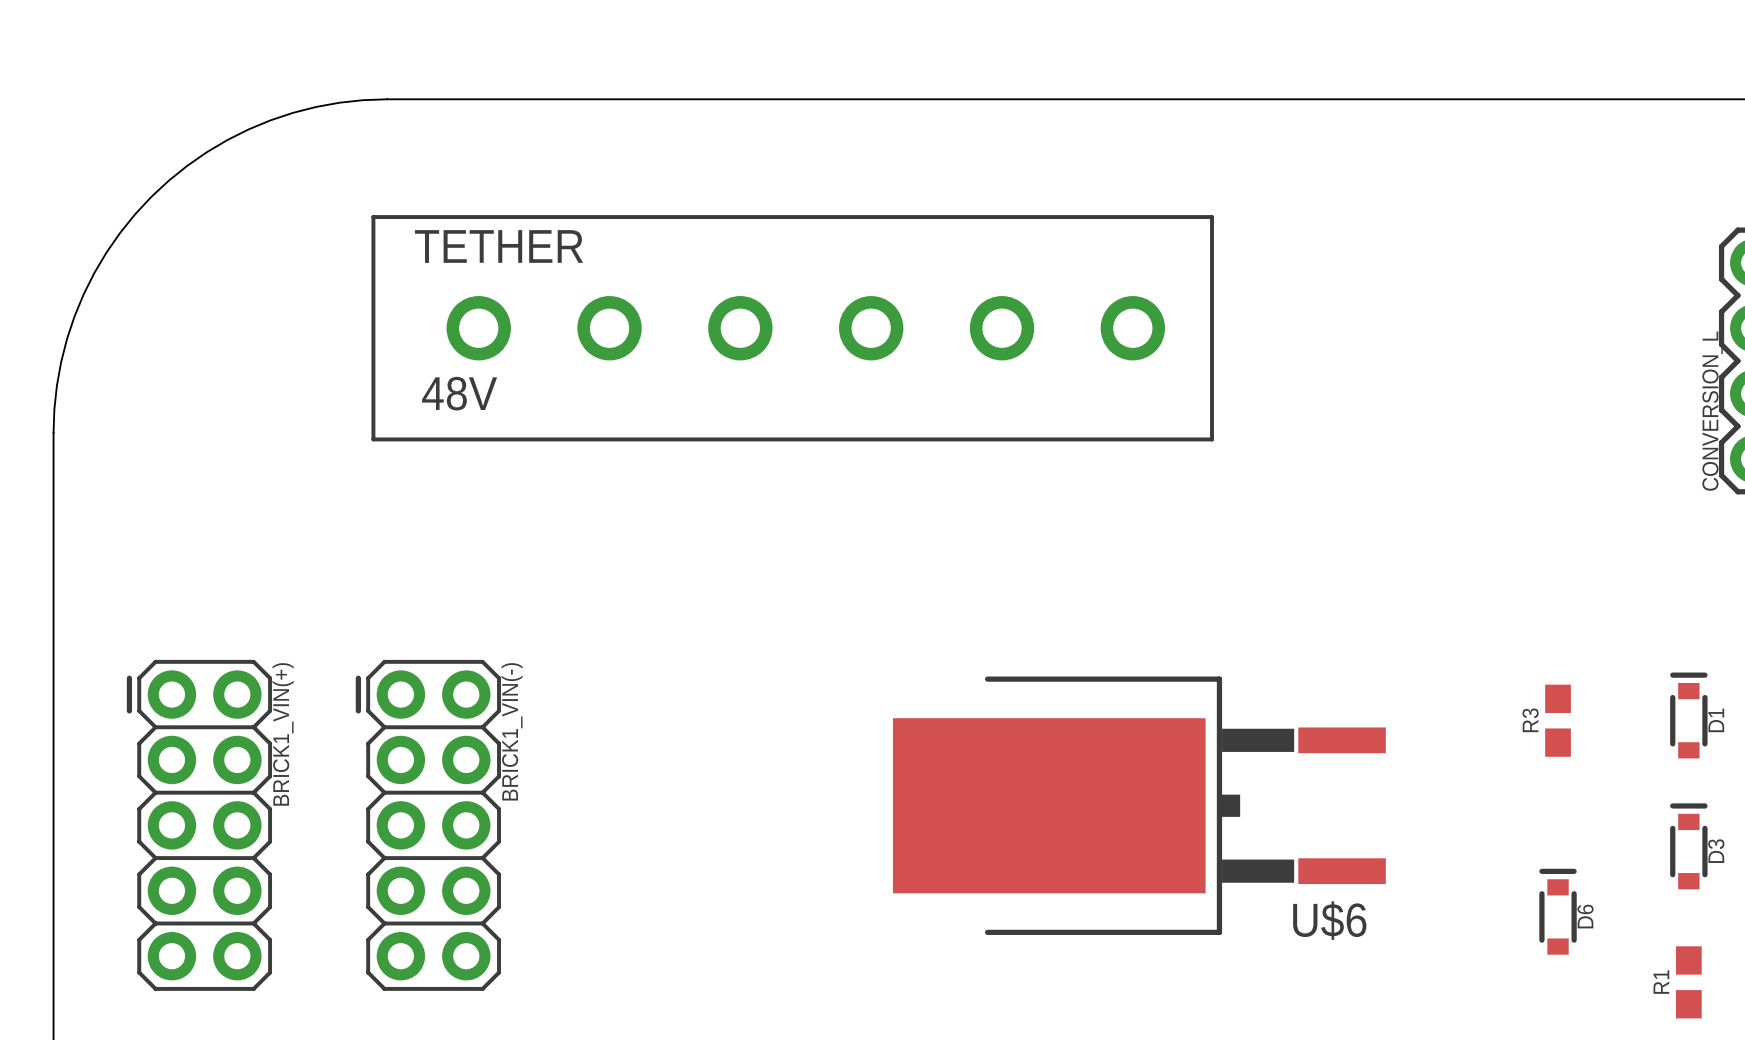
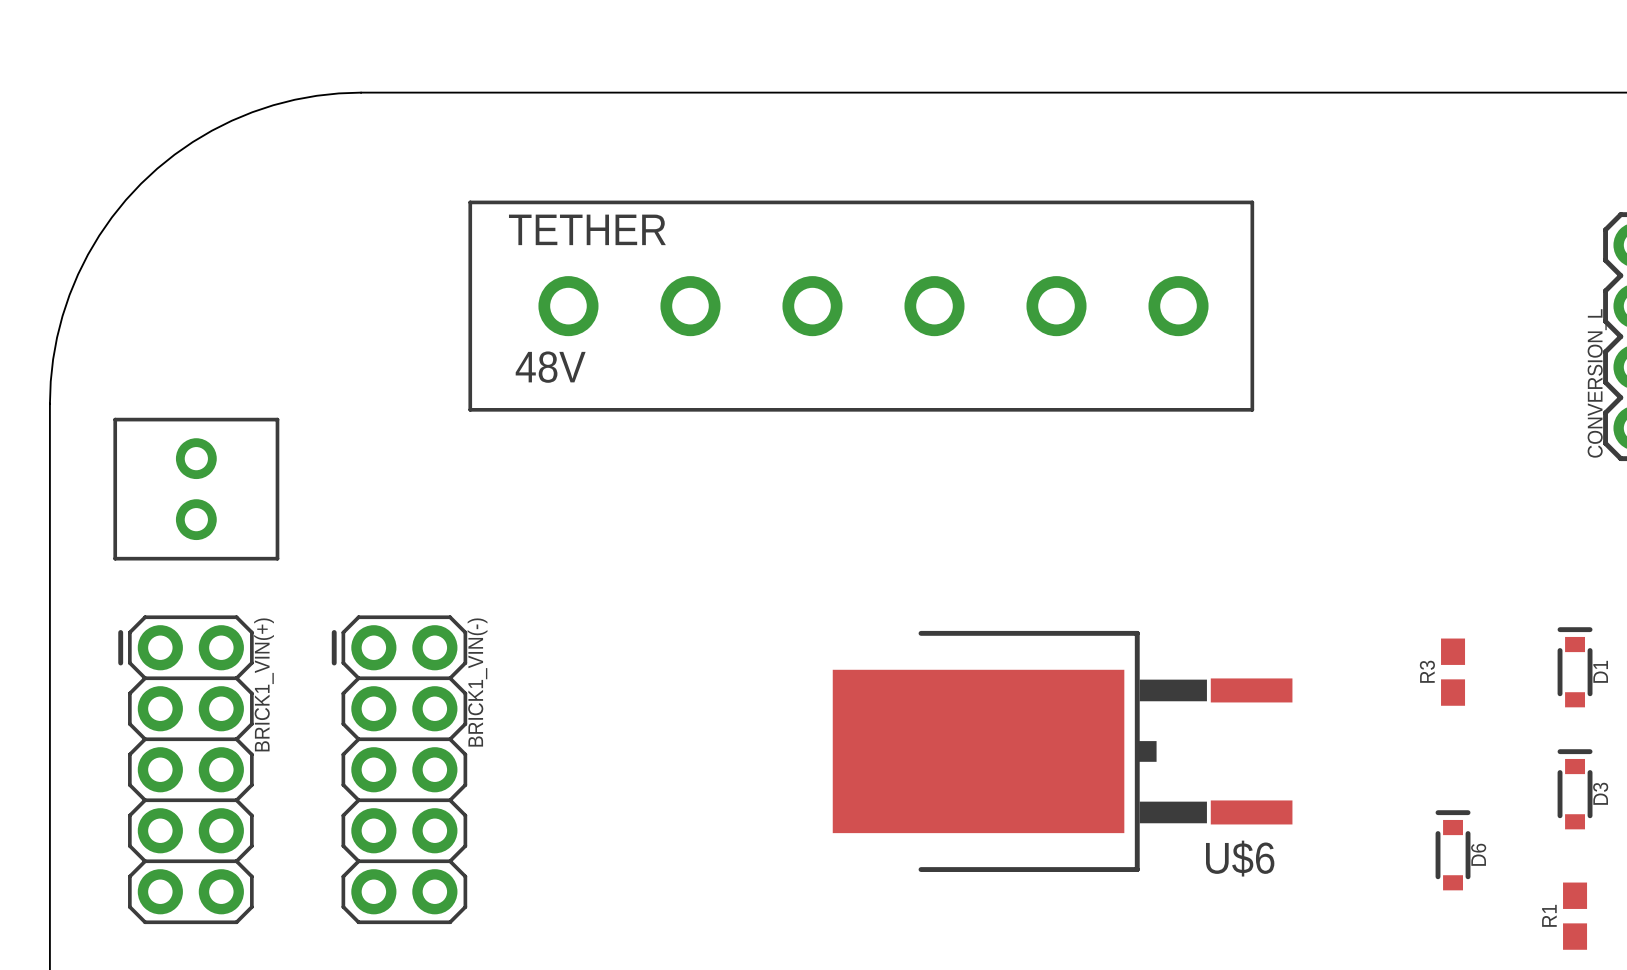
TETHER position: (792, 328) -> (861, 306)
part: none -> (196, 489)

